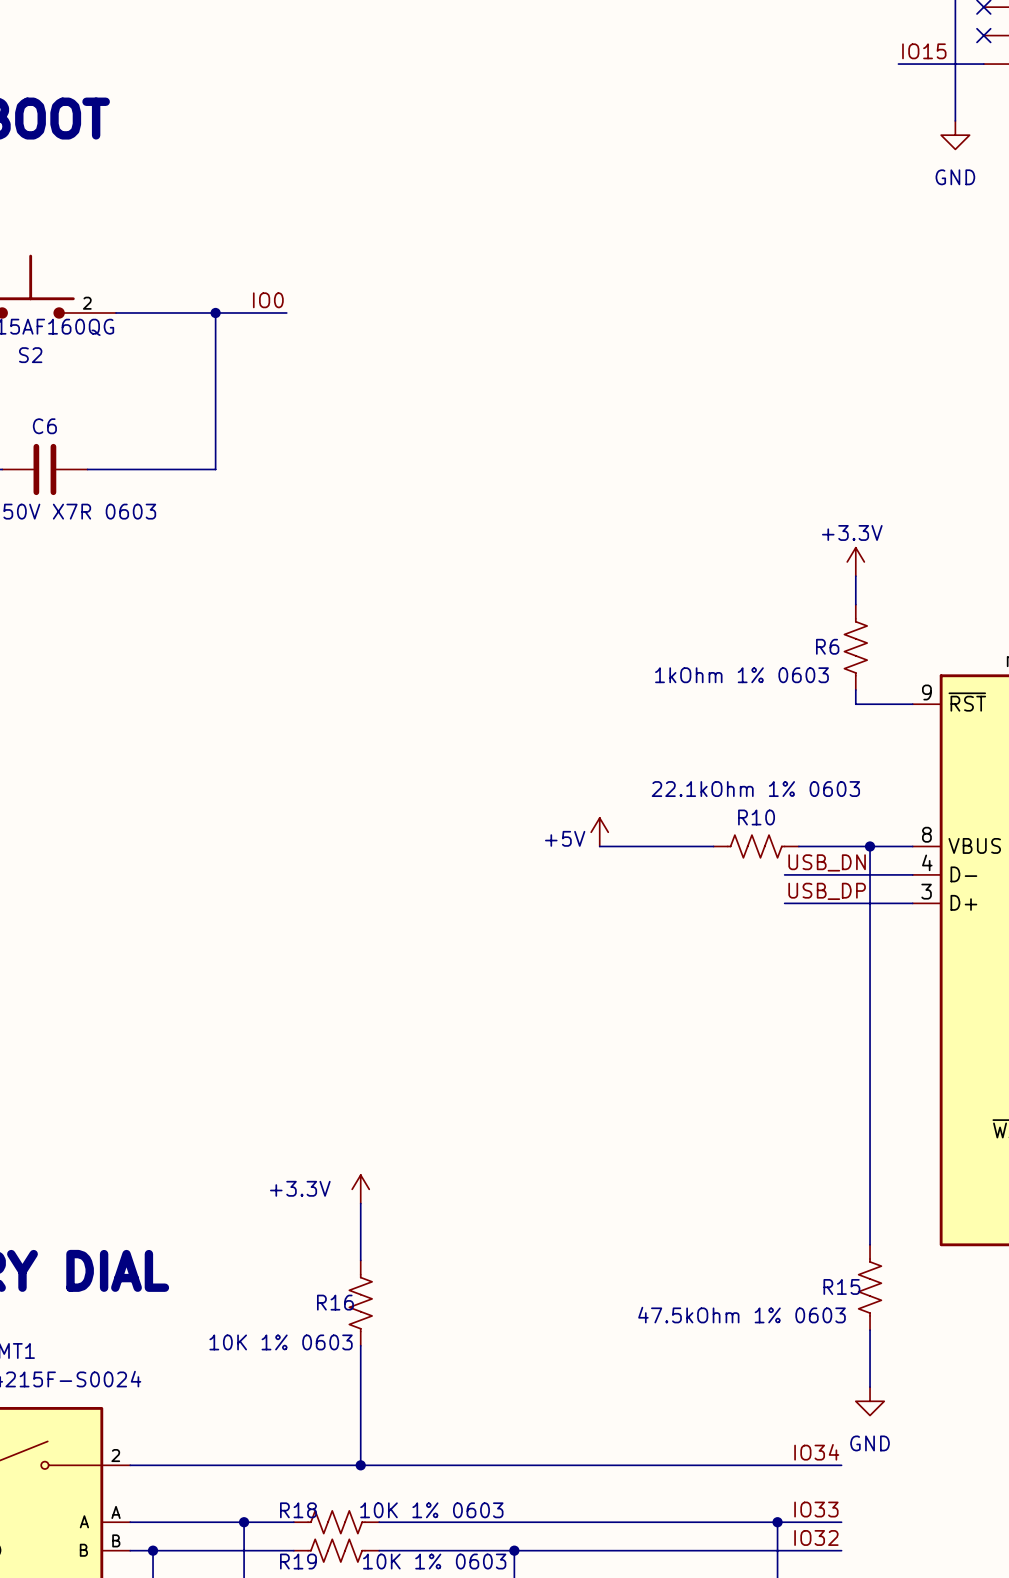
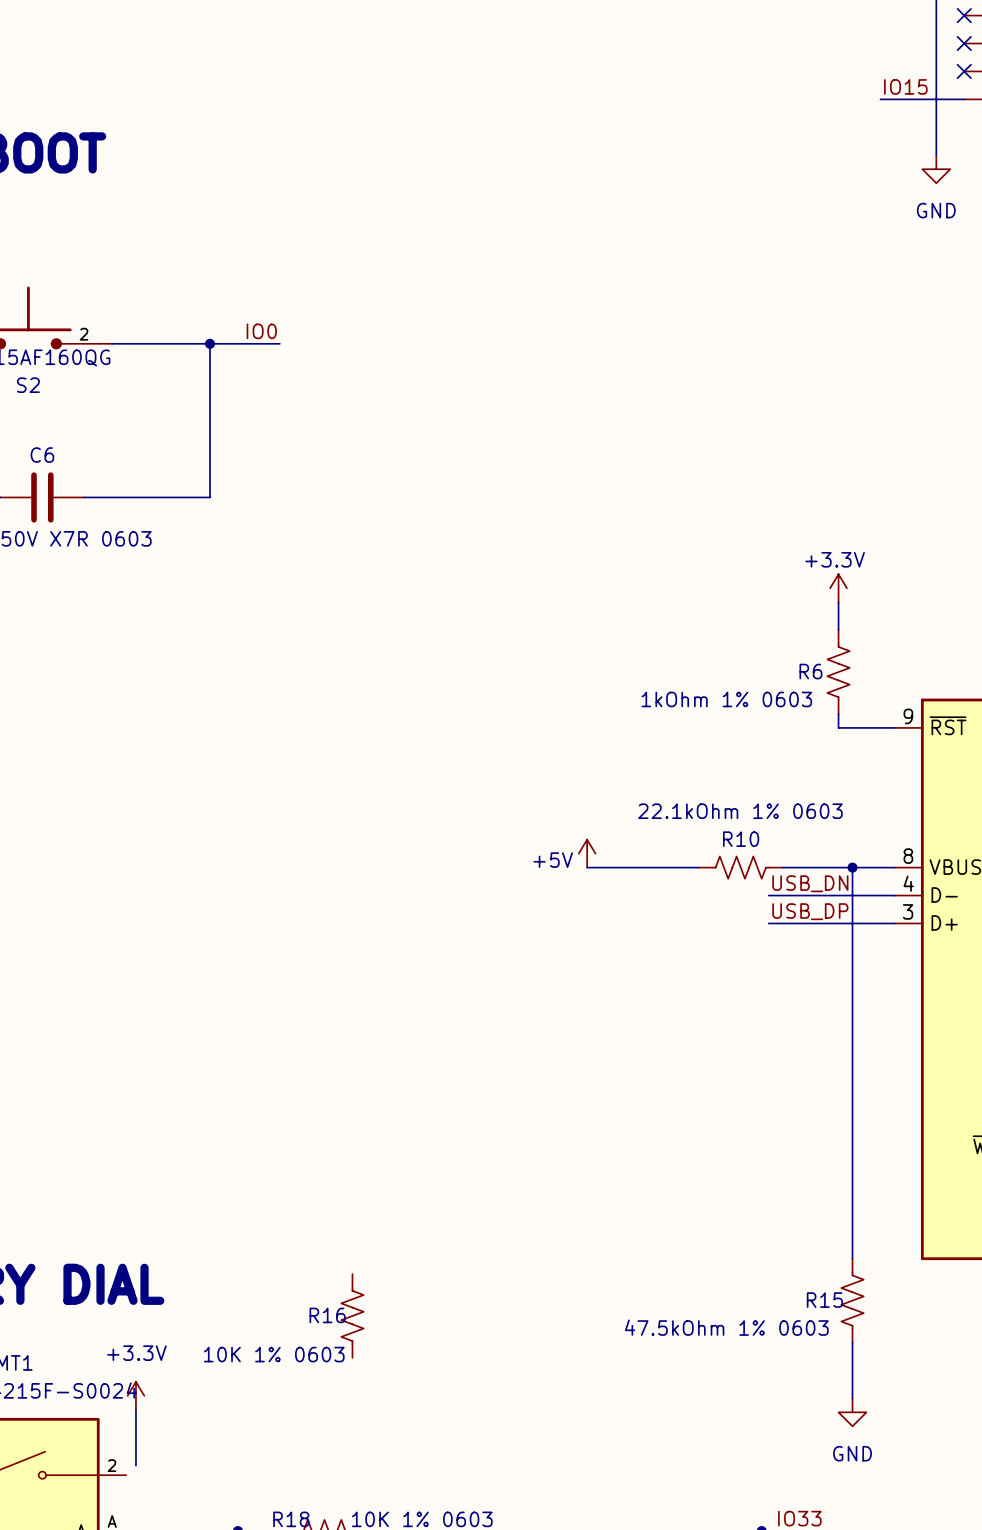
power symbol: +3.3V (360, 1189) -> none
wire: (360, 1203) (360, 1260) -> none
wire: (360, 1345) (360, 1465) -> none
power symbol: none -> +3.3V (135, 1395)
wire: none -> (135, 1409) (135, 1465)
label: IO34 (816, 1452) -> none
wire: (130, 1465) (841, 1465) -> none
junction: (360, 1465) -> none

